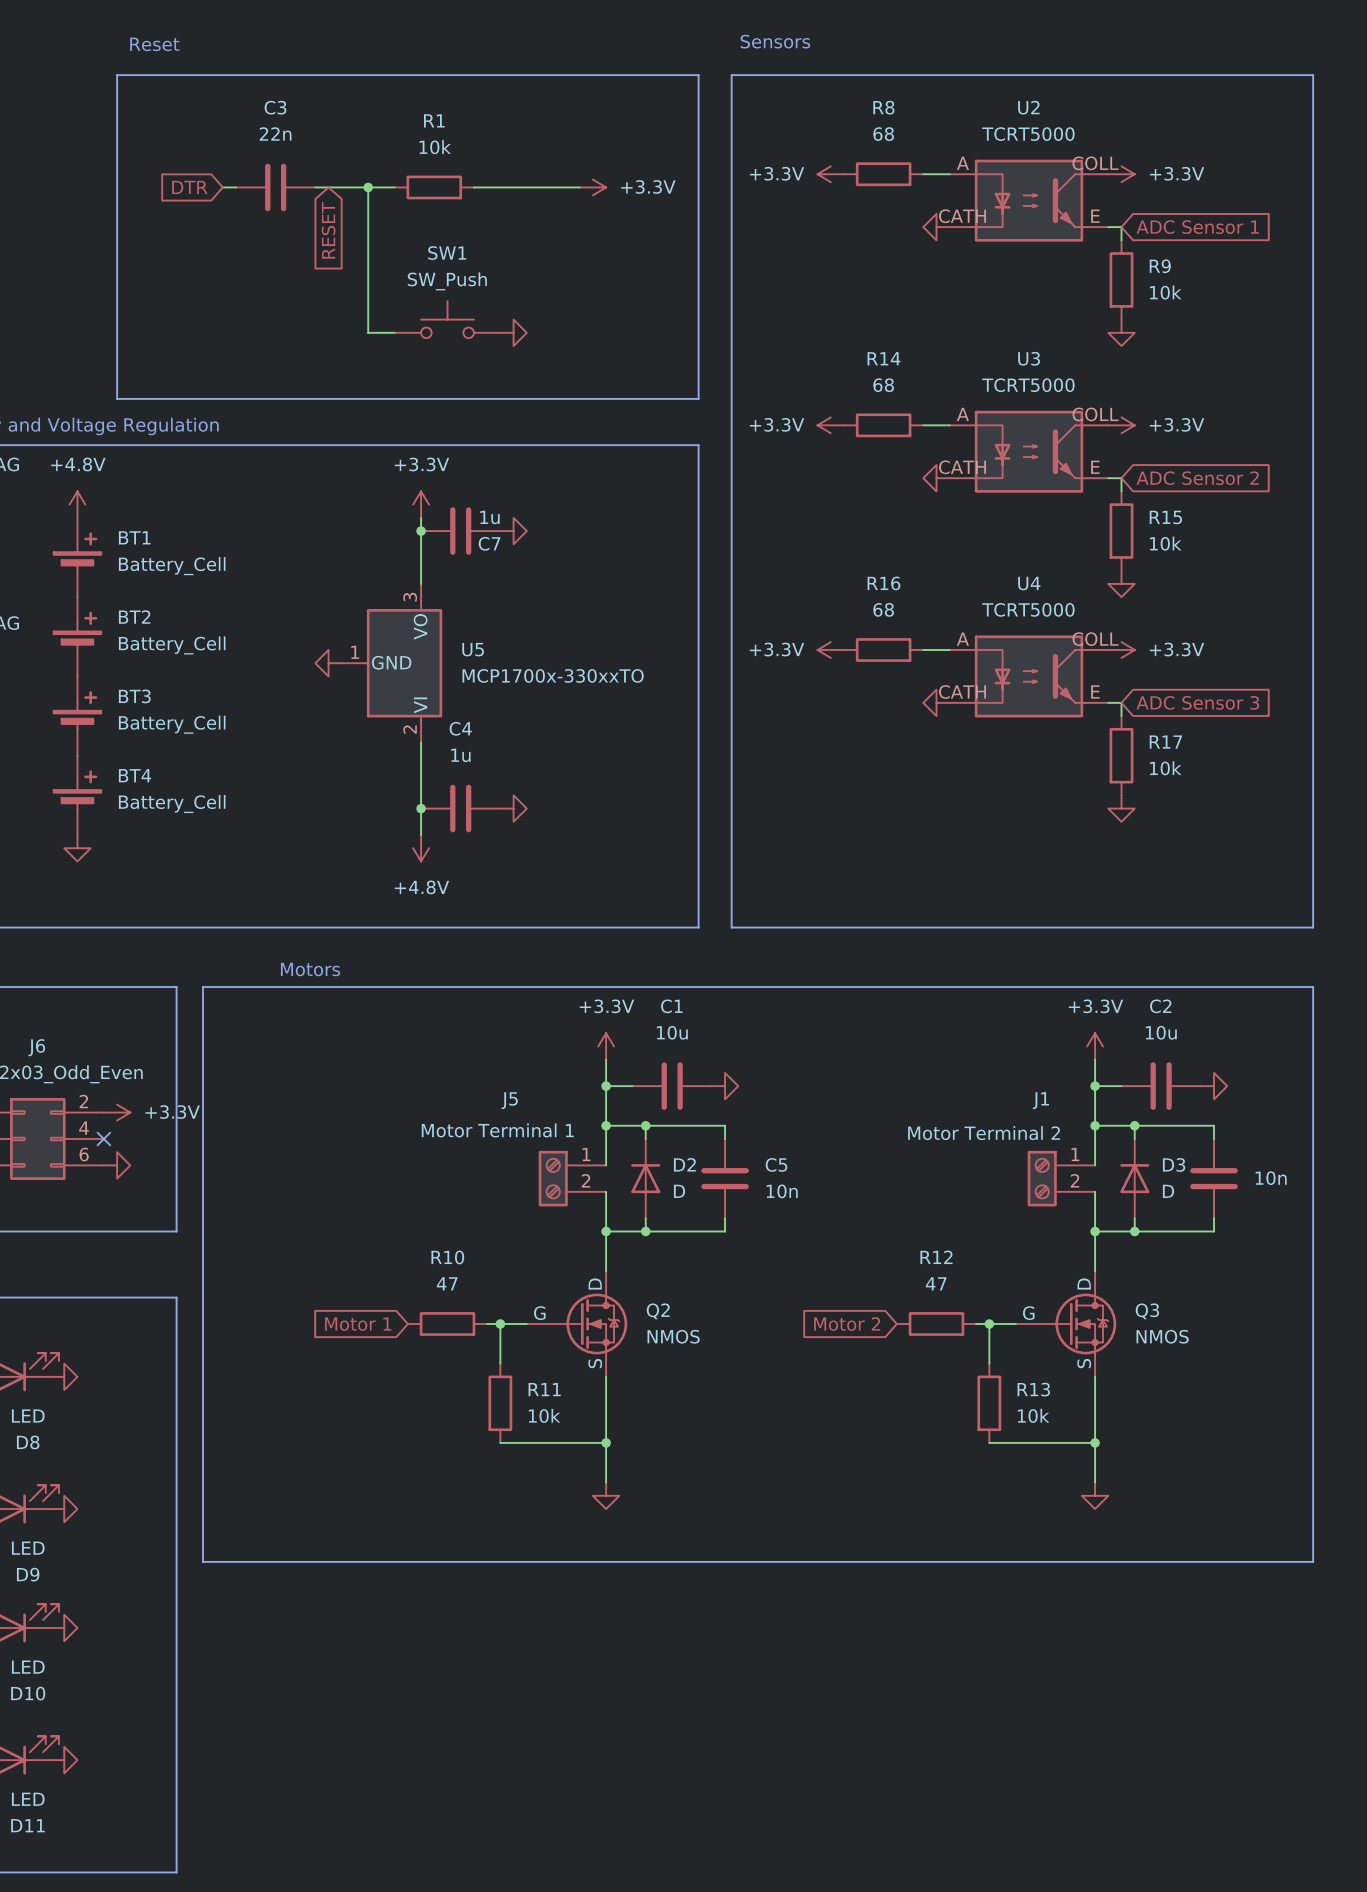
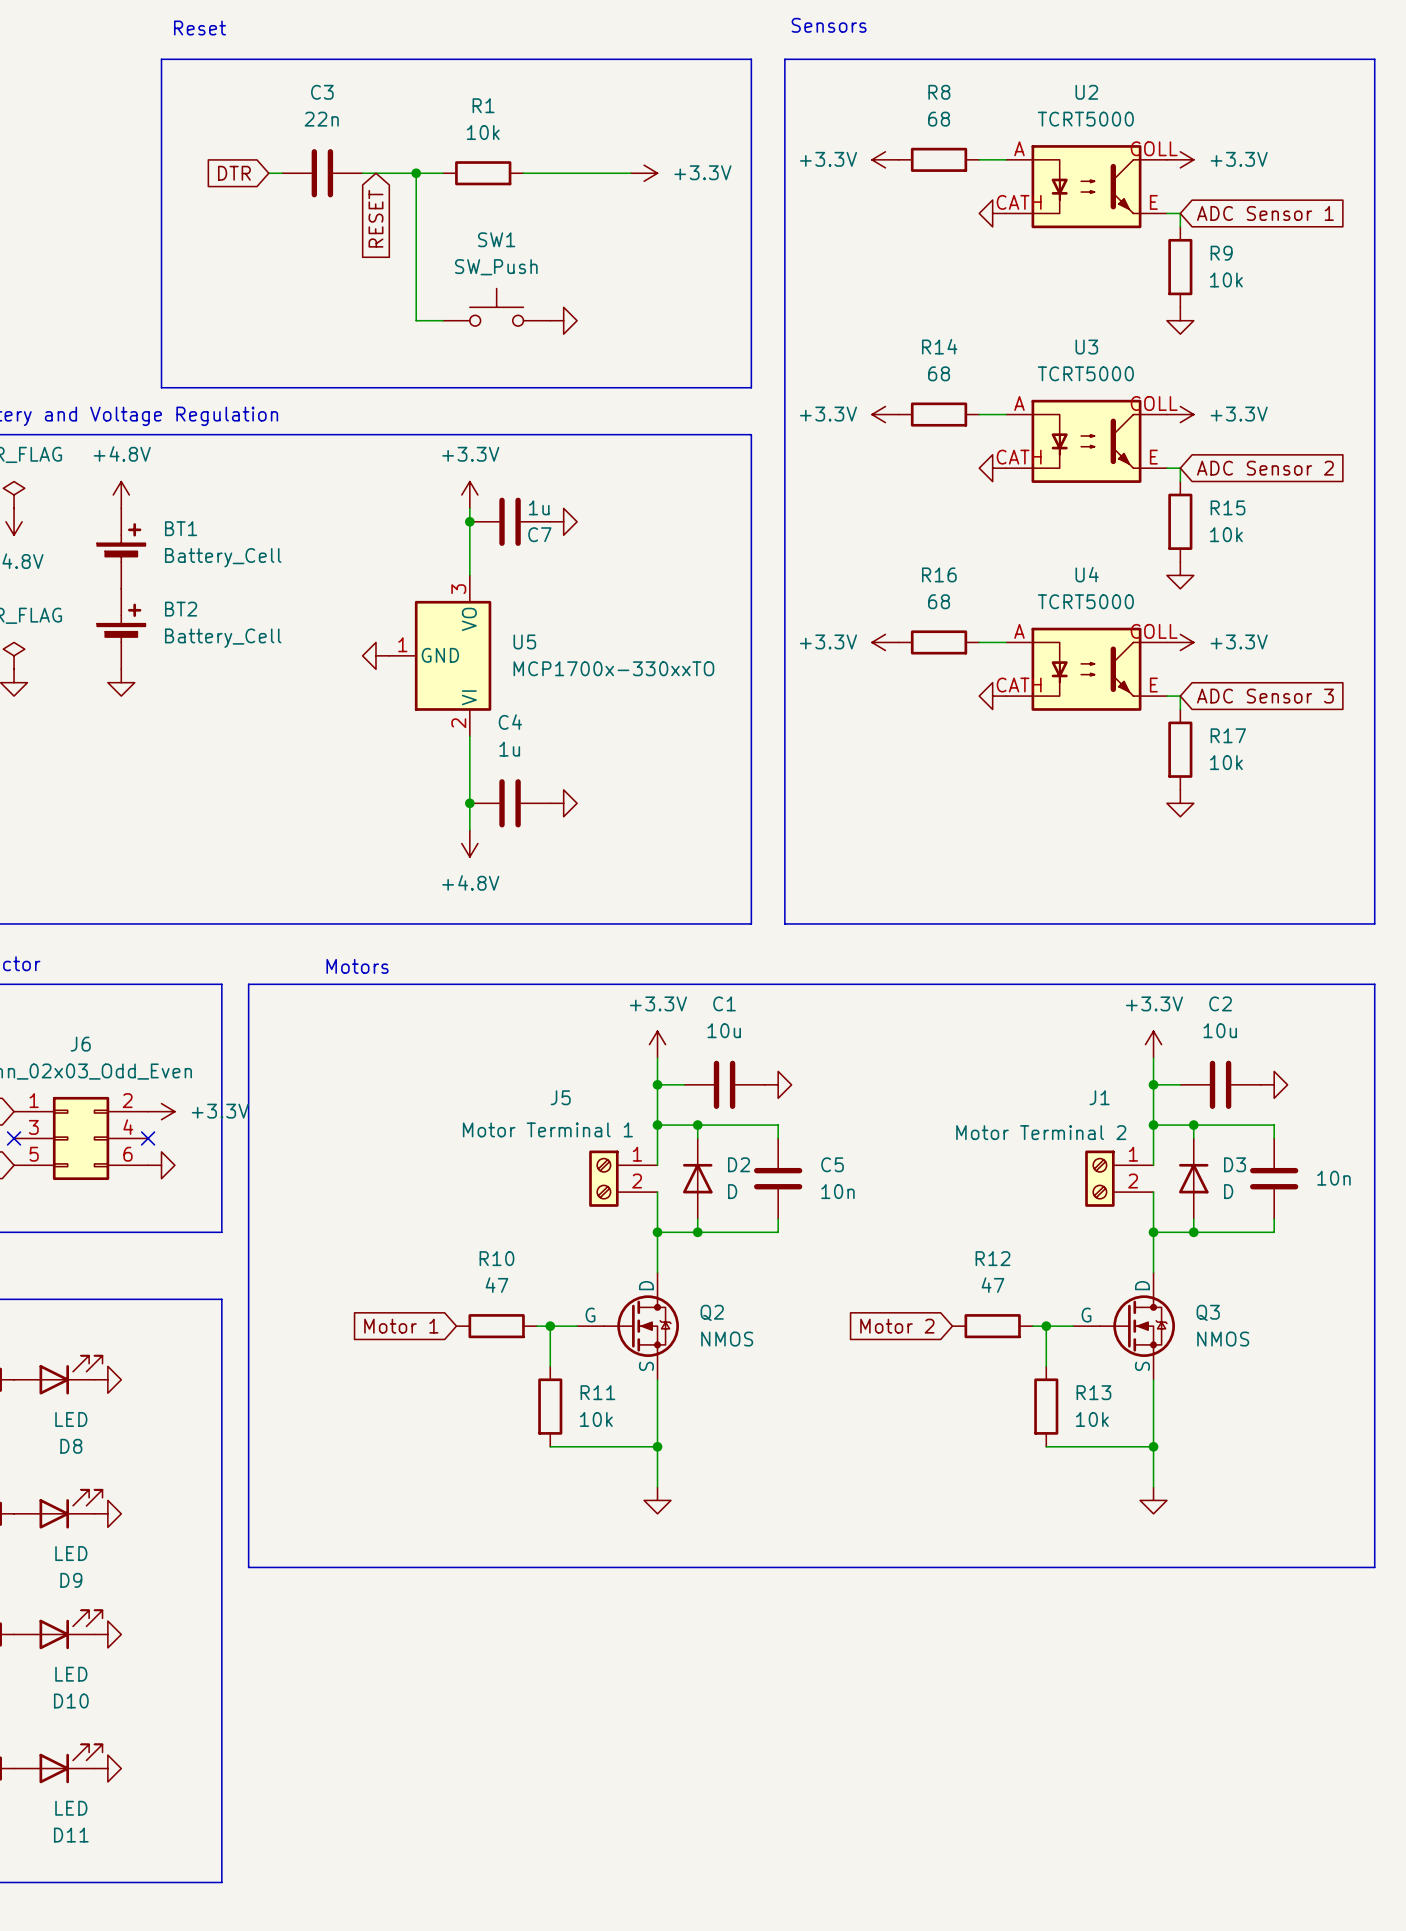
BT3: Battery_Cell (77, 716) -> none
BT4: Battery_Cell (77, 795) -> none
power symbol position: (77, 848) -> (121, 682)

